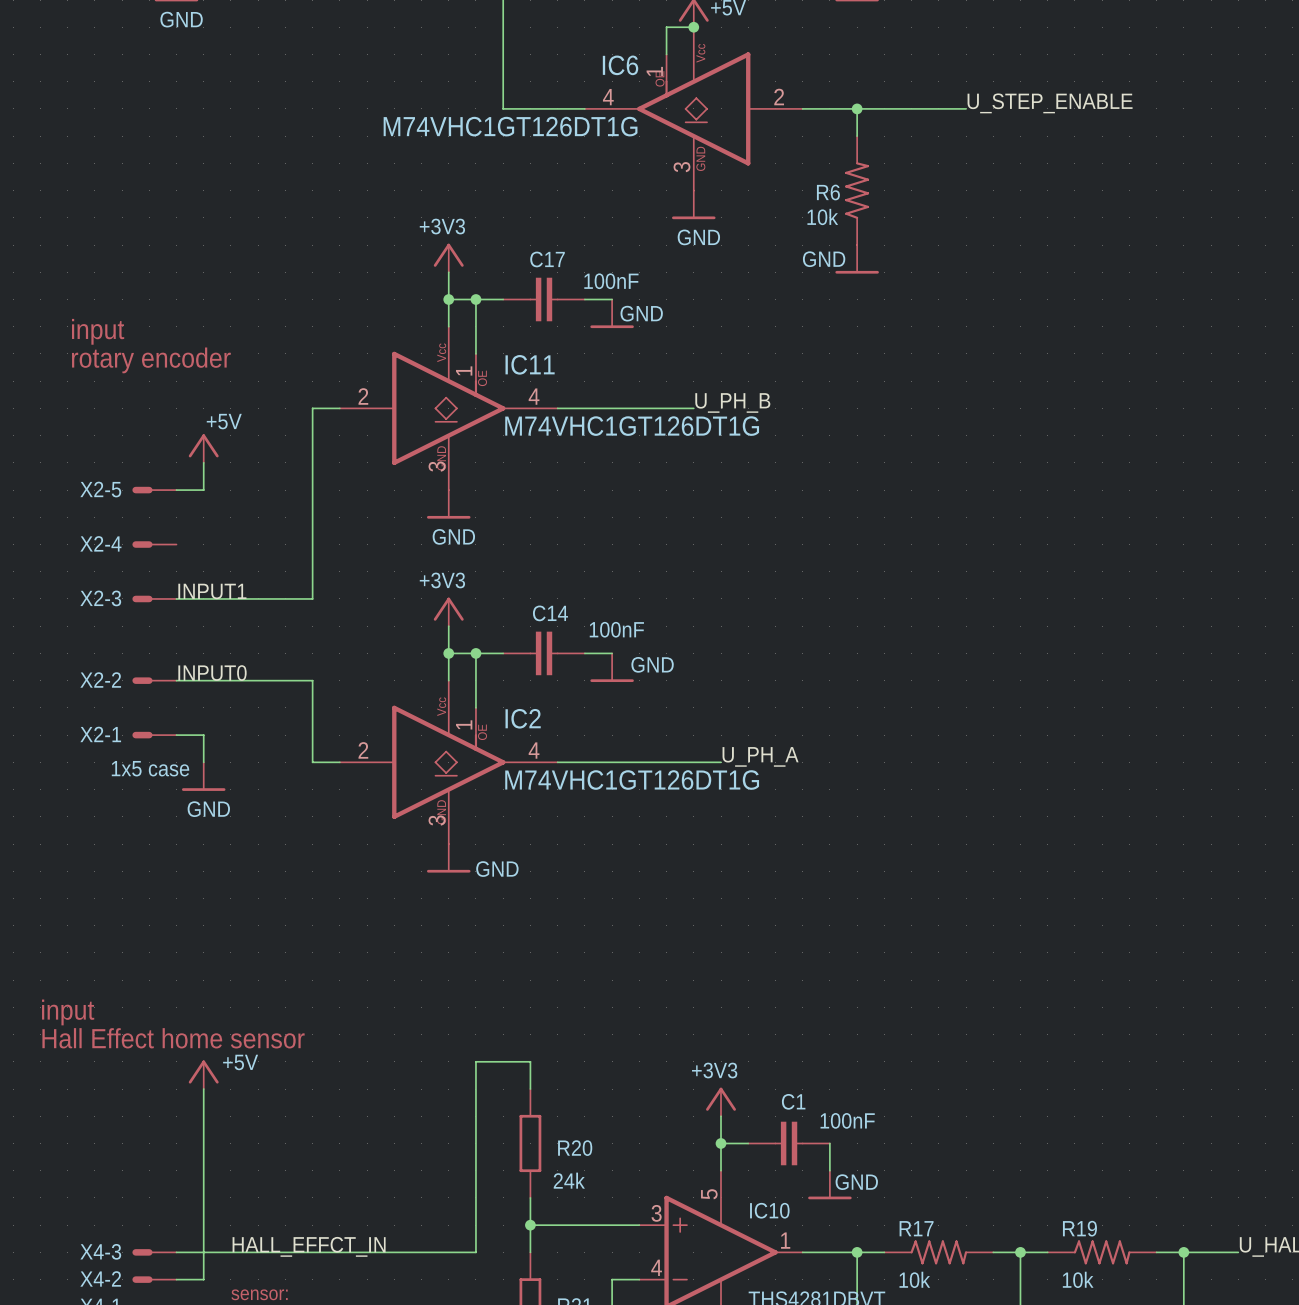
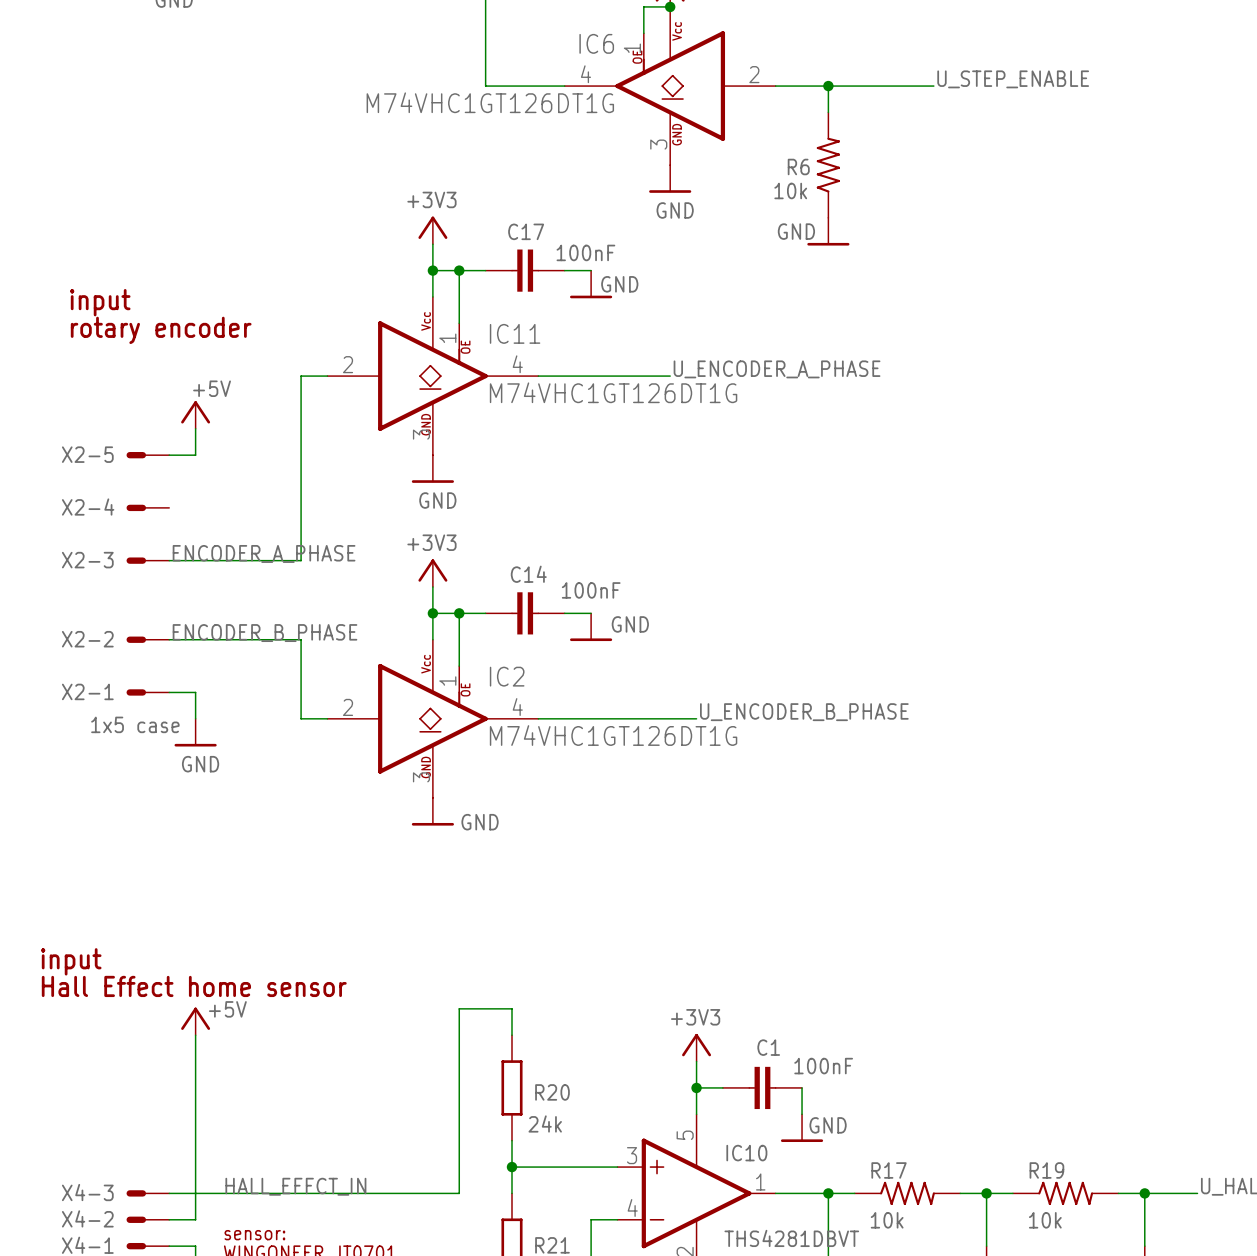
label: U_PH_B (732, 402) -> U_ENCODER_A_PHASE (777, 369)
label: INPUT1 (212, 591) -> ENCODER_A_PHASE (264, 553)
label: INPUT0 (212, 673) -> ENCODER_B_PHASE (265, 633)
label: U_PH_A (760, 756) -> U_ENCODER_B_PHASE (804, 712)

